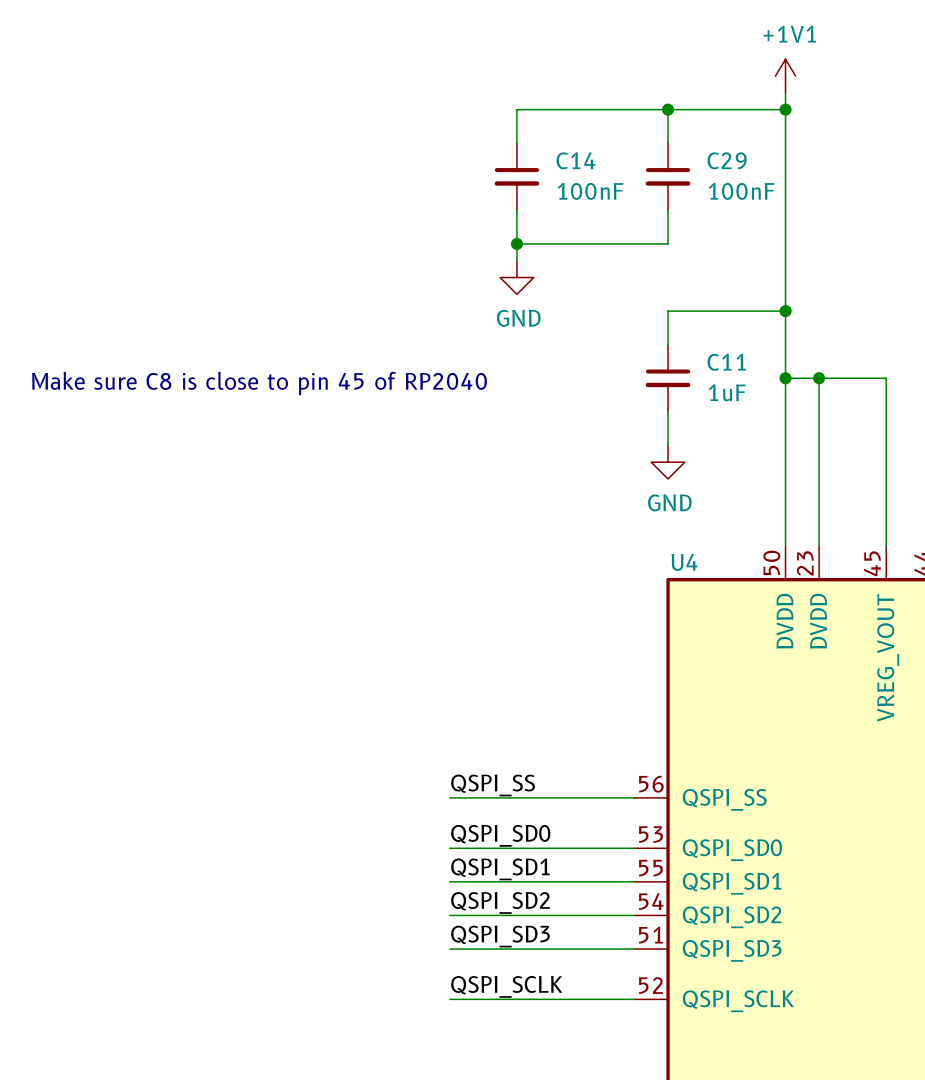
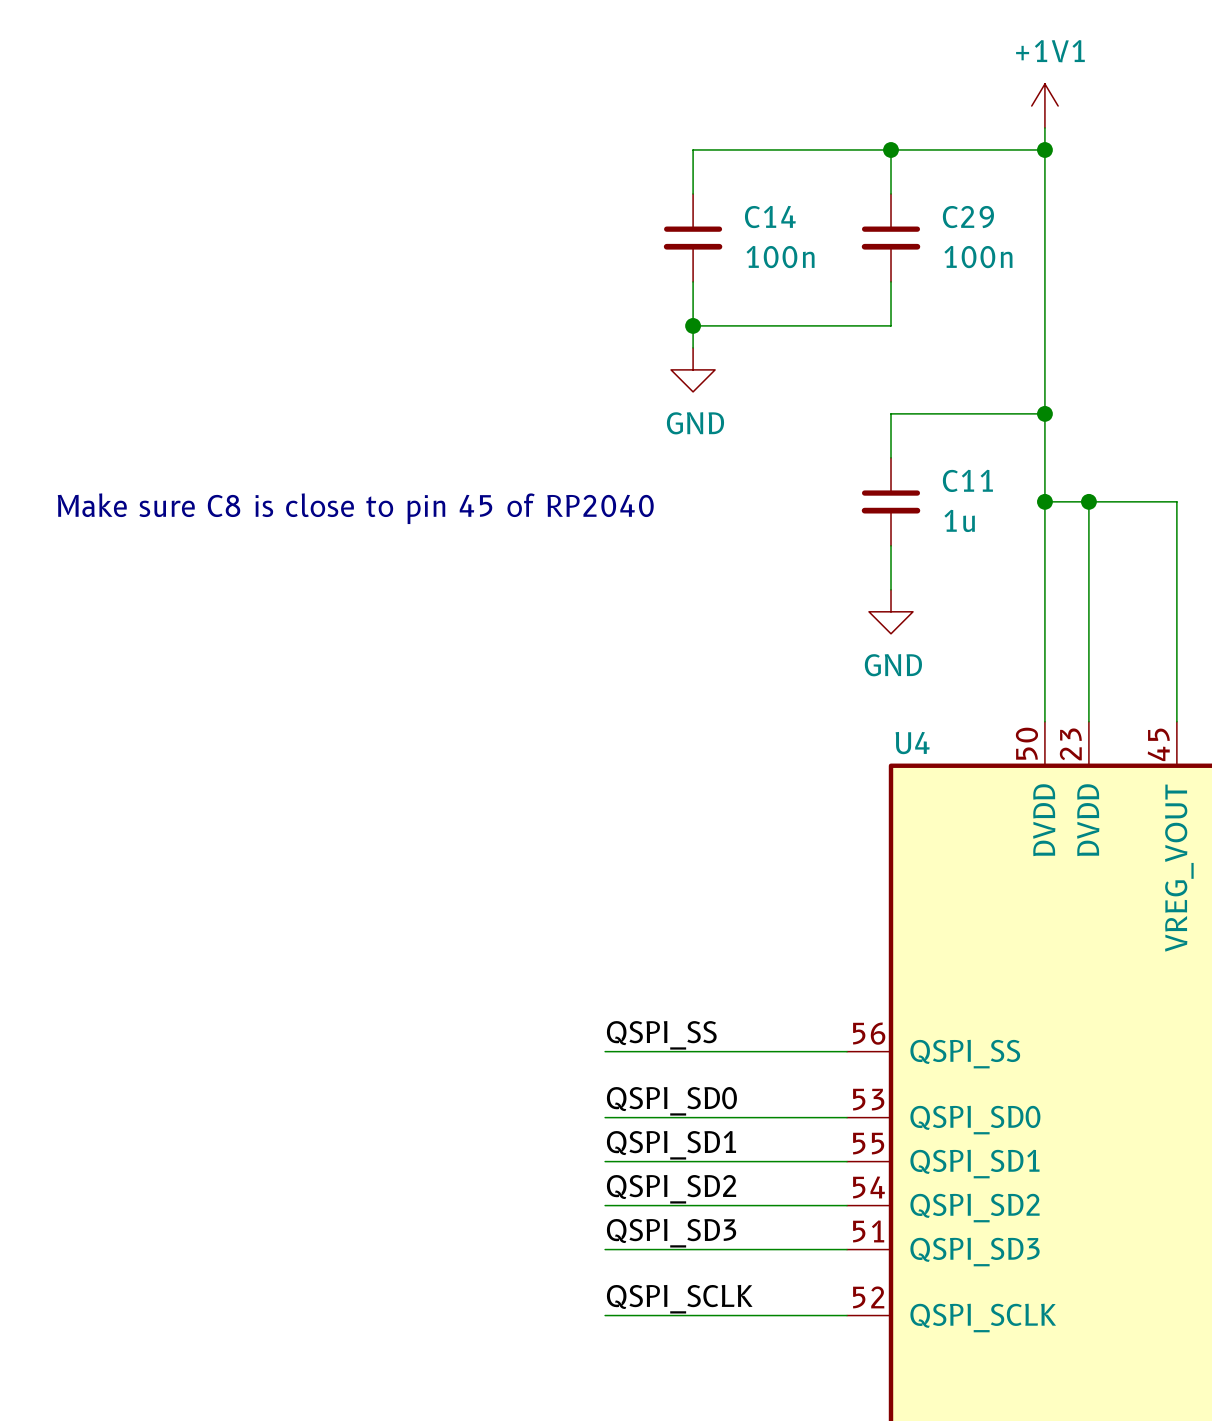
C14 value: 100nF (590, 191) -> 100n (780, 257)
C29 value: 100nF (741, 191) -> 100n (978, 257)
C11 value: 1uF (727, 392) -> 1u (959, 520)

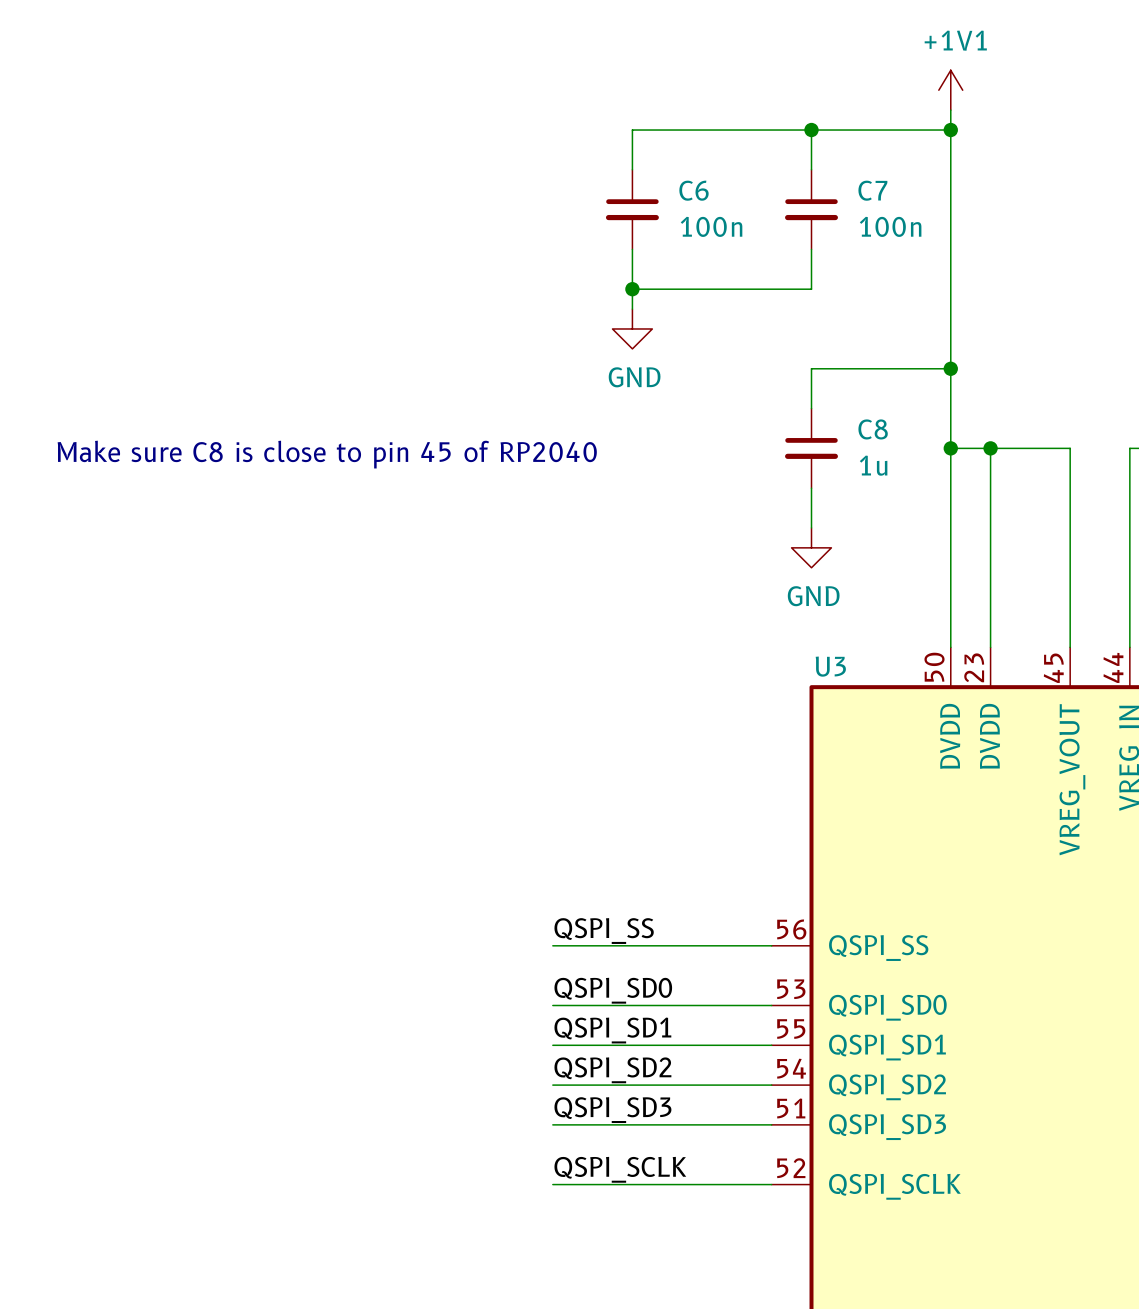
C14 name: C14 (770, 217) -> C6 (694, 190)
C29 name: C29 (968, 217) -> C7 (872, 190)
C11 name: C11 (967, 480) -> C8 (873, 429)
U4 name: U4 (912, 743) -> U3 (830, 666)

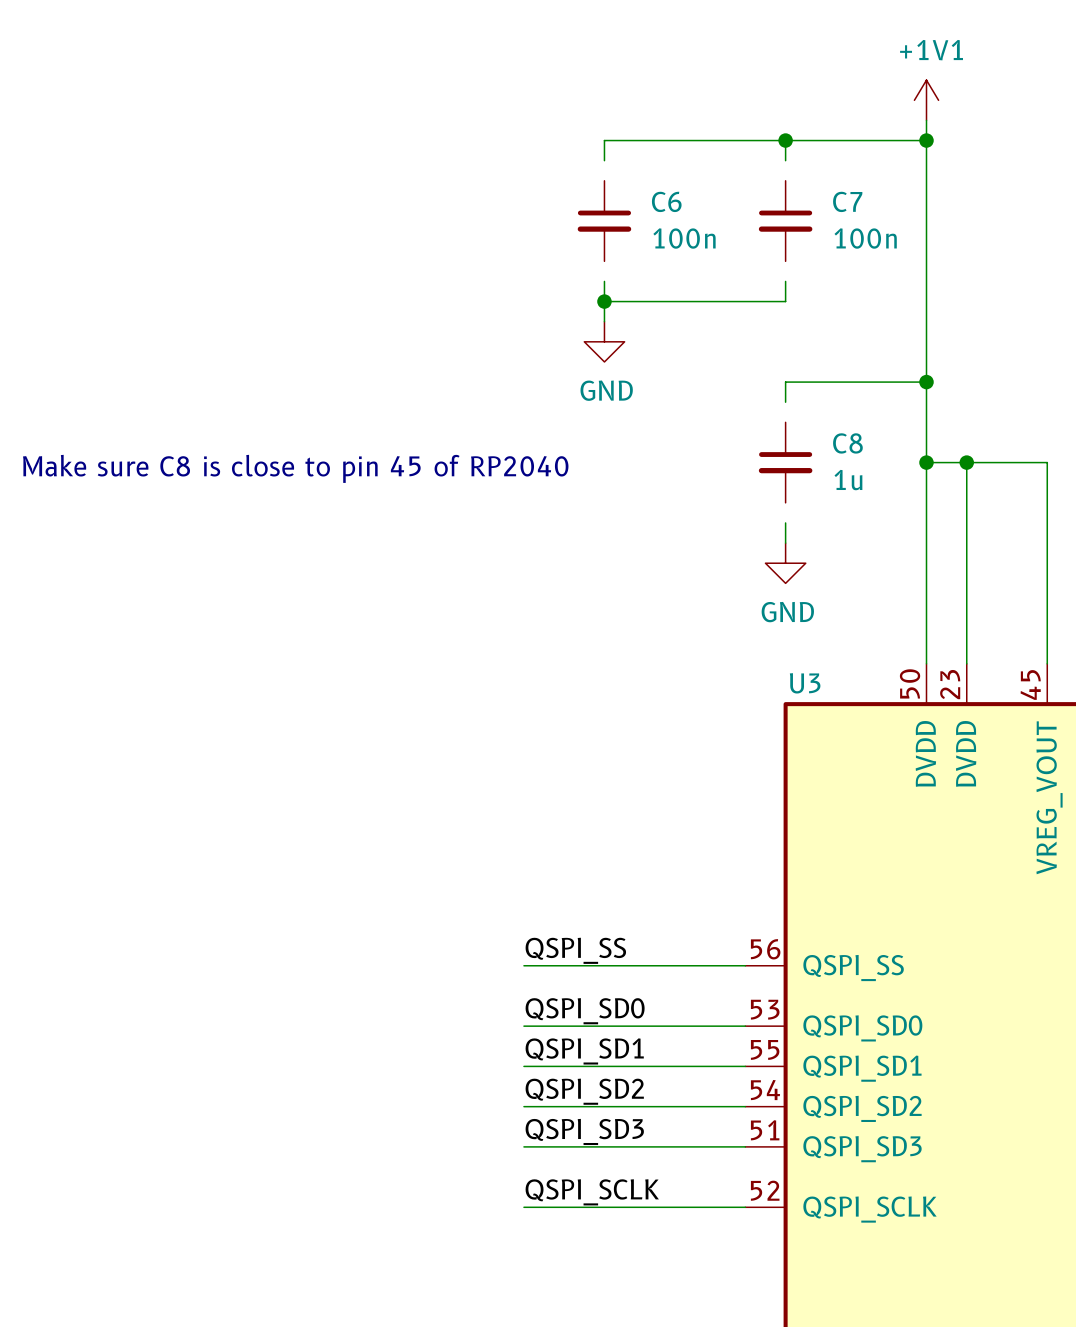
wire: (632, 149) (632, 169) -> none
wire: (811, 149) (811, 169) -> none
wire: (632, 249) (632, 269) -> none
wire: (811, 249) (811, 269) -> none
wire: (811, 388) (811, 408) -> none
wire: (811, 488) (811, 508) -> none

